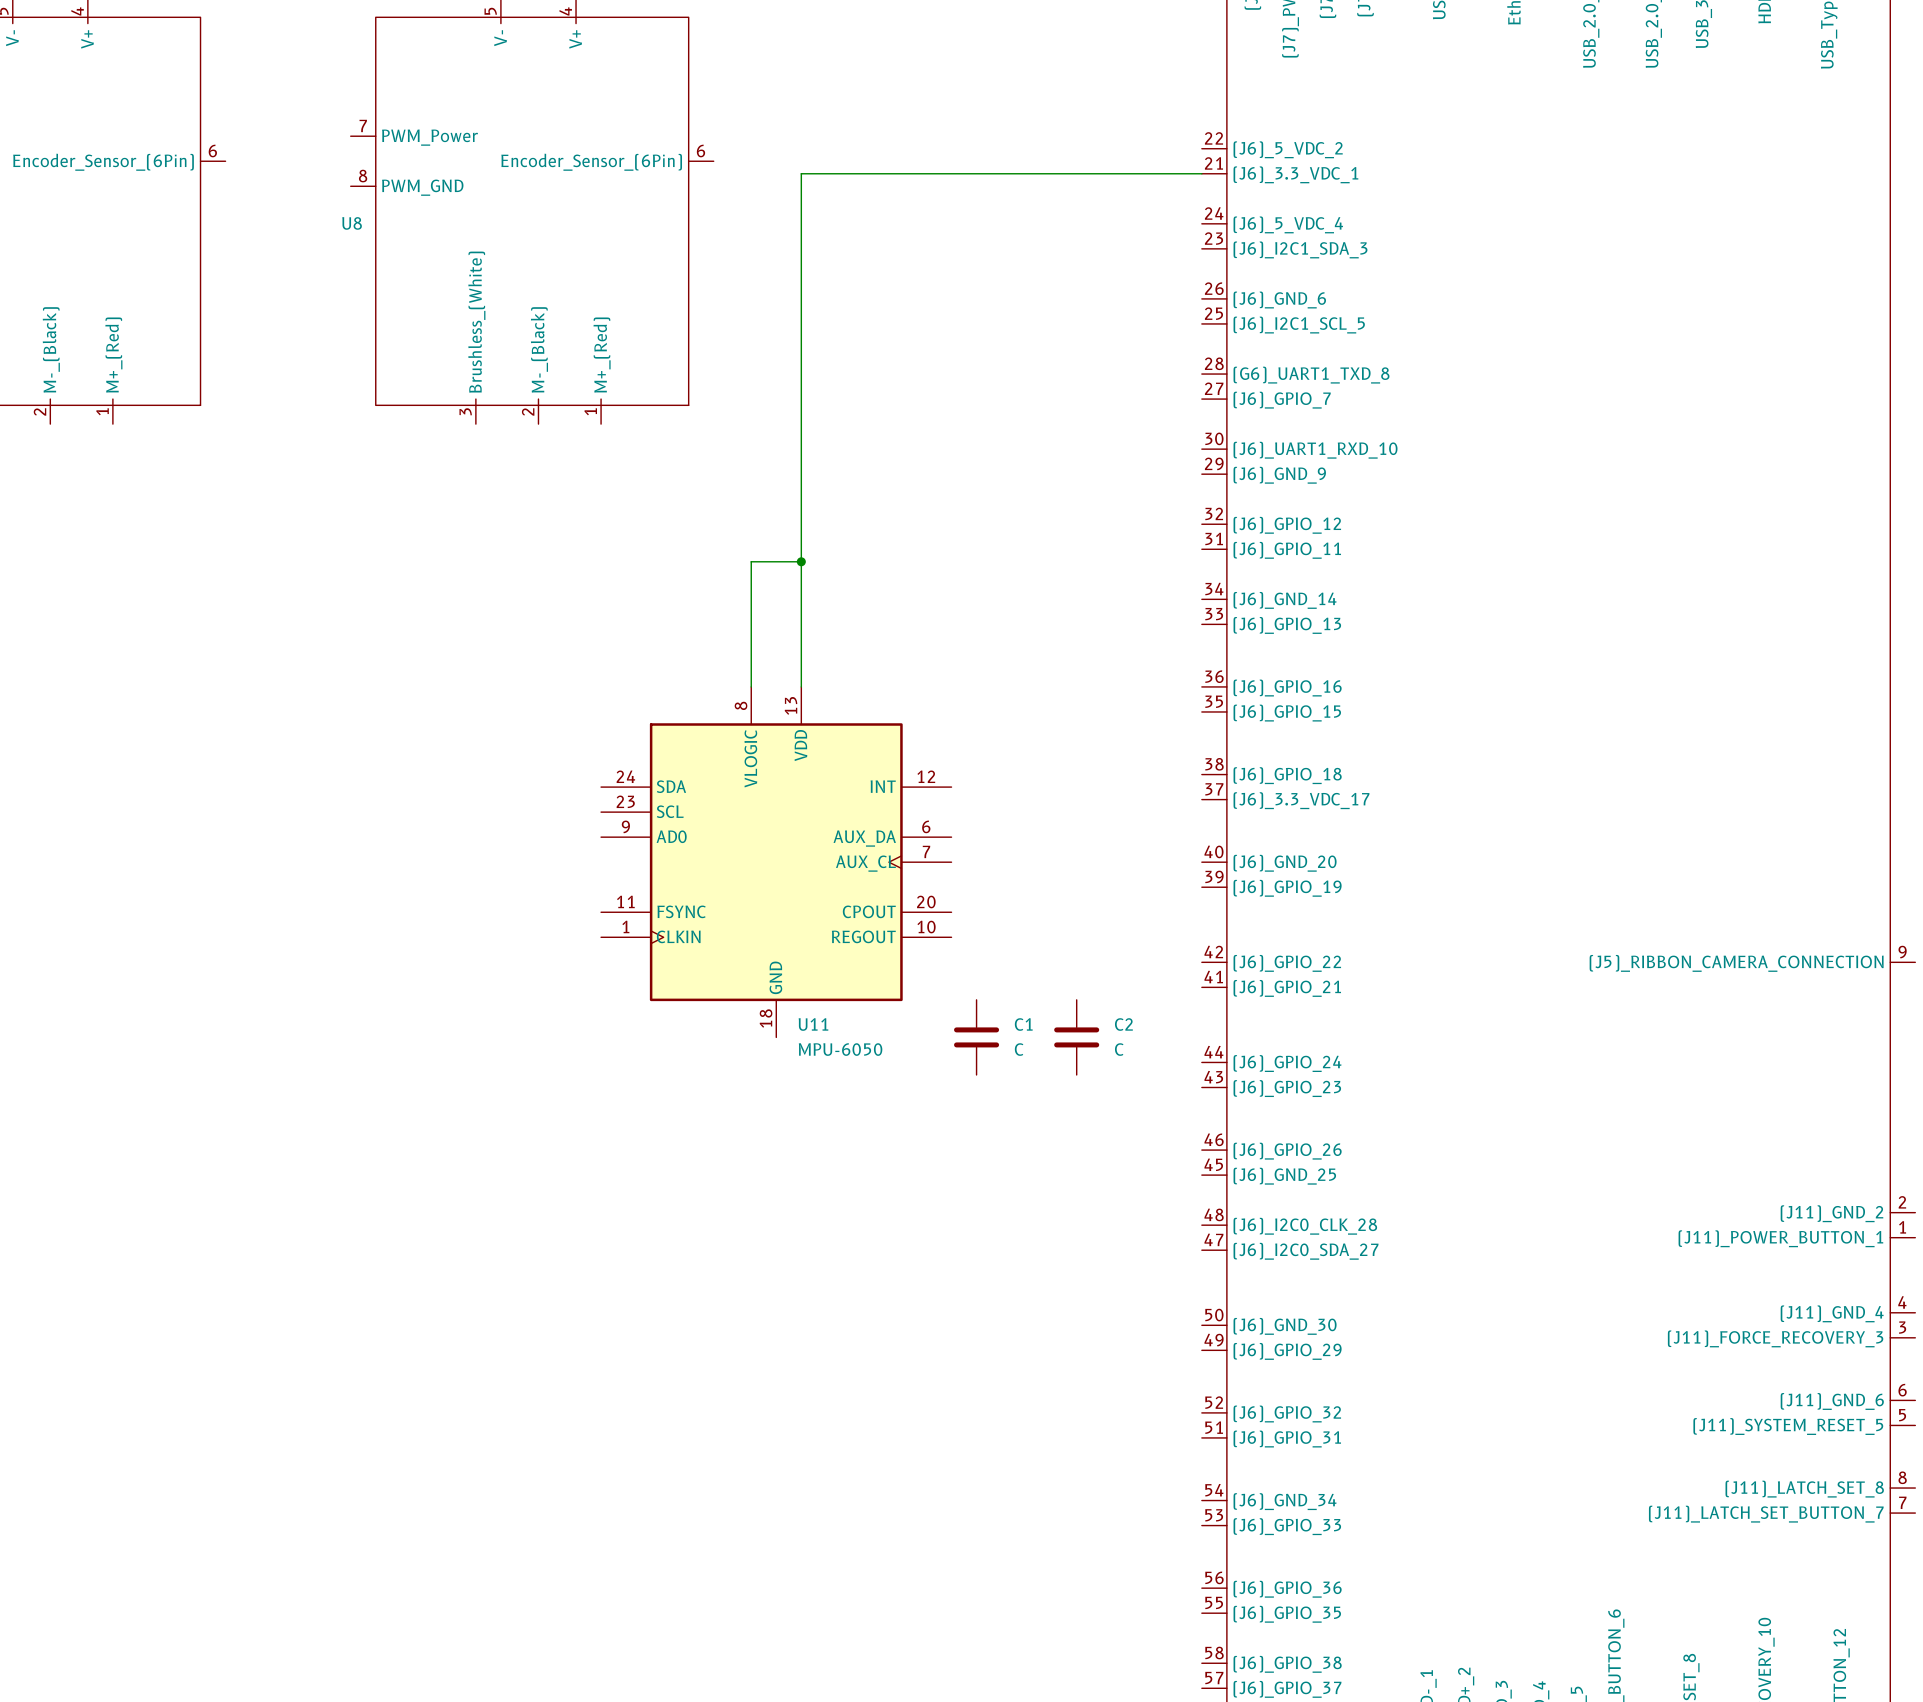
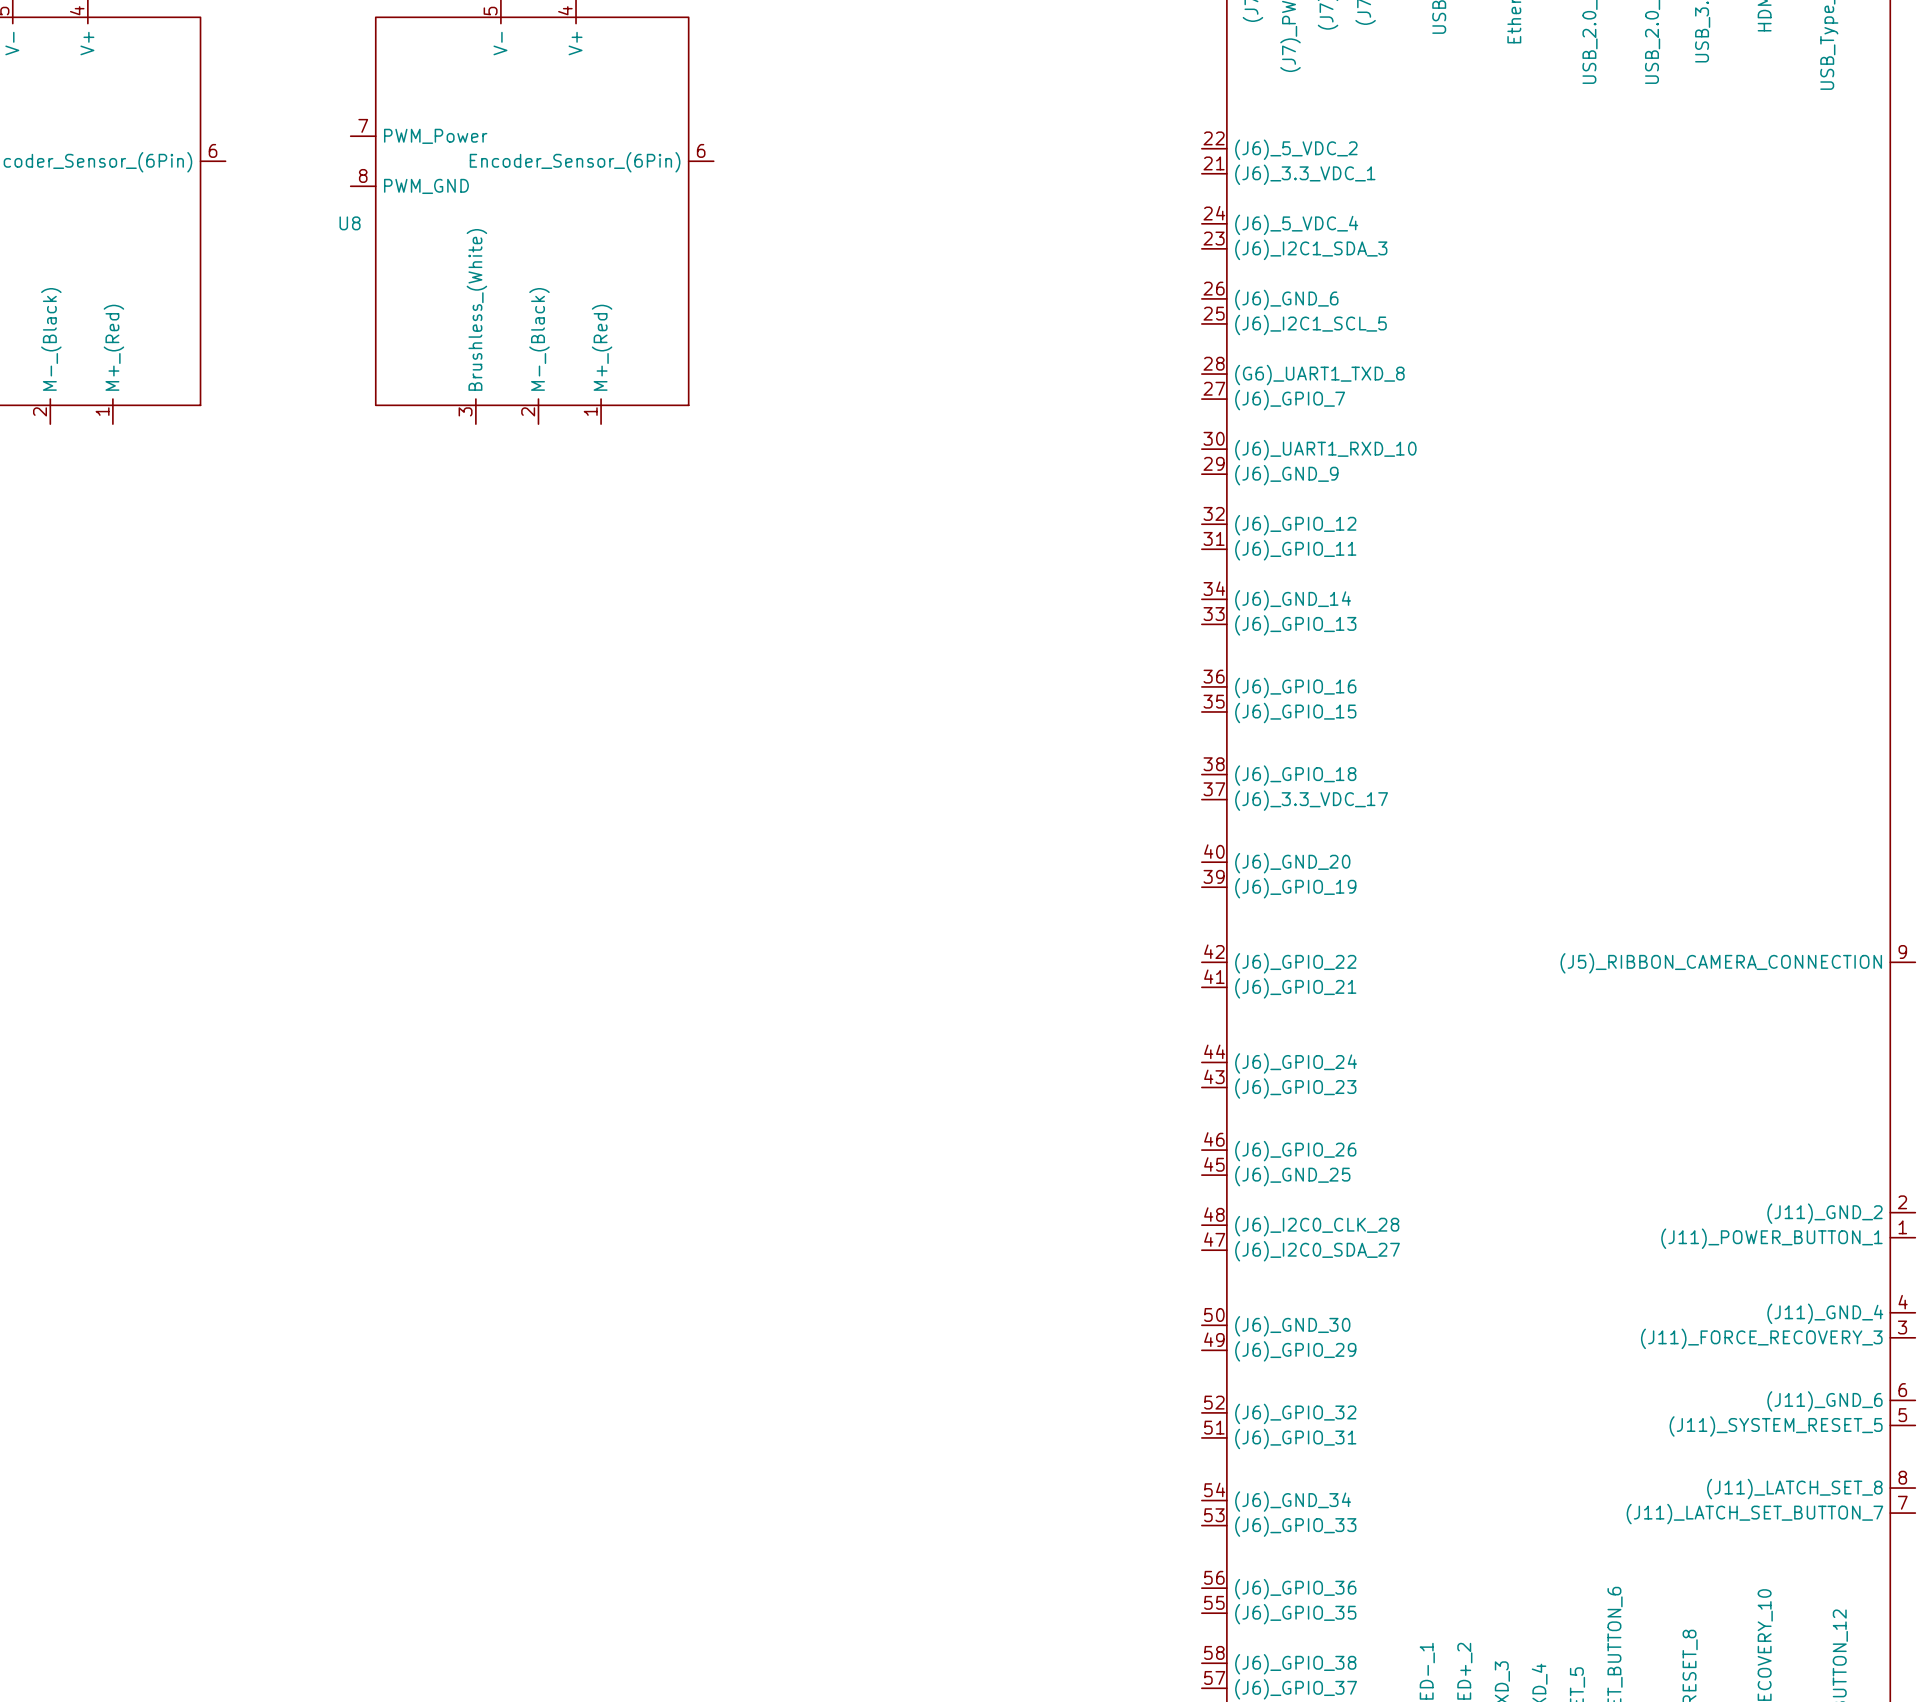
wire: (1201, 173) (801, 173) (801, 686) -> none
wire: (801, 561) (751, 561) (751, 686) -> none
junction: (801, 561) -> none
U11: MPU-6050 (776, 862) -> none
C1: C (976, 1037) -> none
C2: C (1076, 1037) -> none

